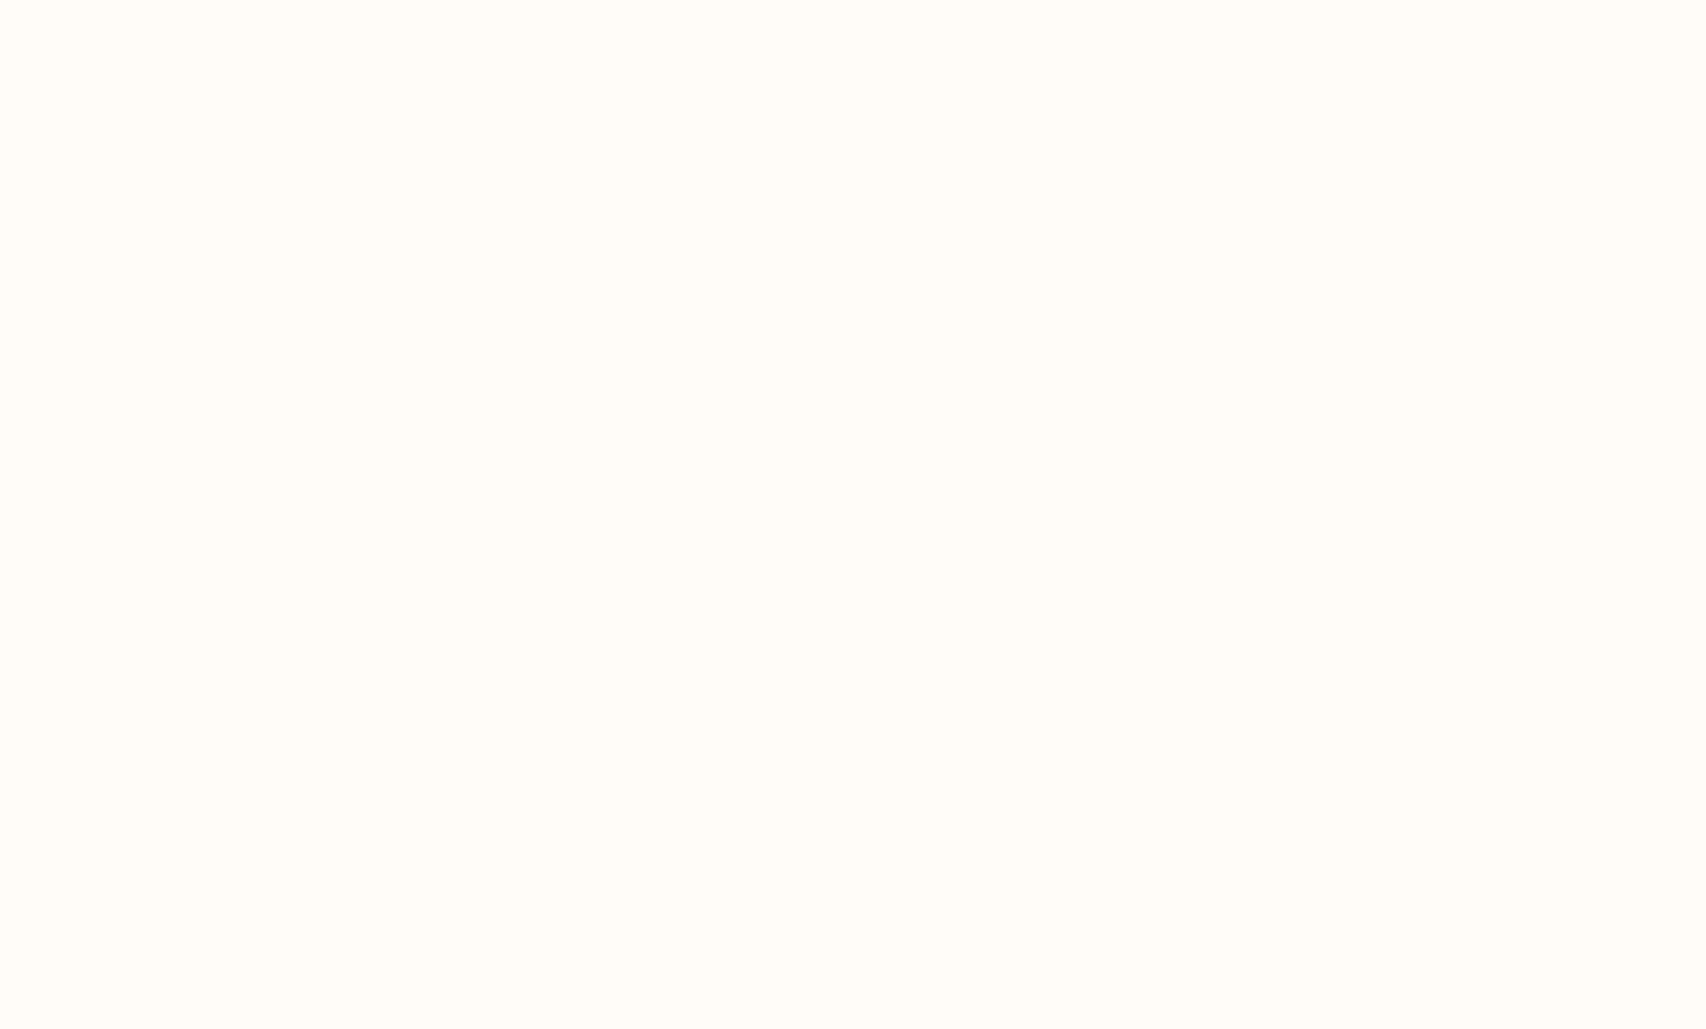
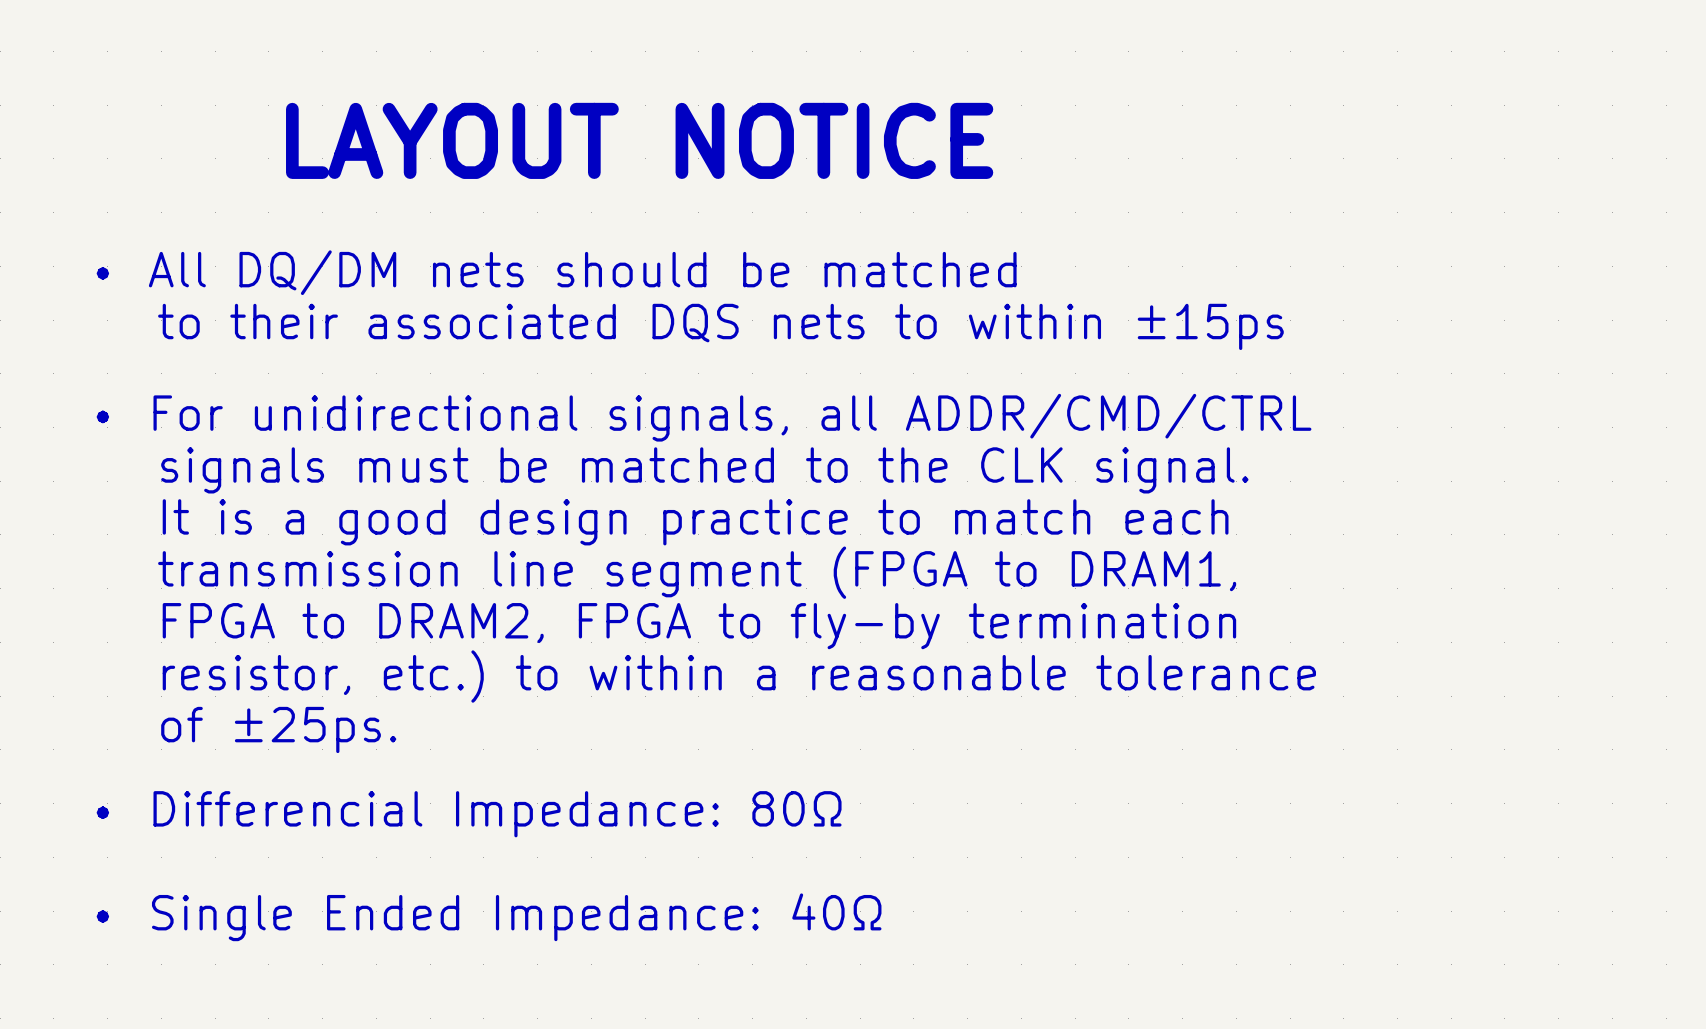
text: none -> LAYOUT NOTICE (639, 140)
text: none -> • All DQ/DM nets should be matched (556, 272)
text: none -> to their associated DQS nets to within ±15ps (720, 326)
text: none -> • For unidirectional signals, all ADDR/CMD/CTRL (704, 417)
text: none -> signals must be matched to the CLK signal. (704, 470)
text: none -> It is a good design practice to match each (695, 522)
text: none -> transmission line segment (FPGA to DRAM1, (697, 572)
text: none -> FPGA to DRAM2, FPGA to fly-by termination (699, 626)
text: none -> resistor, etc.) to within a reasonable tolerance (739, 676)
text: none -> of ±25ps. (278, 729)
text: none -> • Differencial Impedance: 80Ω (469, 814)
text: none -> • Single Ended Impedance: 40Ω (489, 917)

